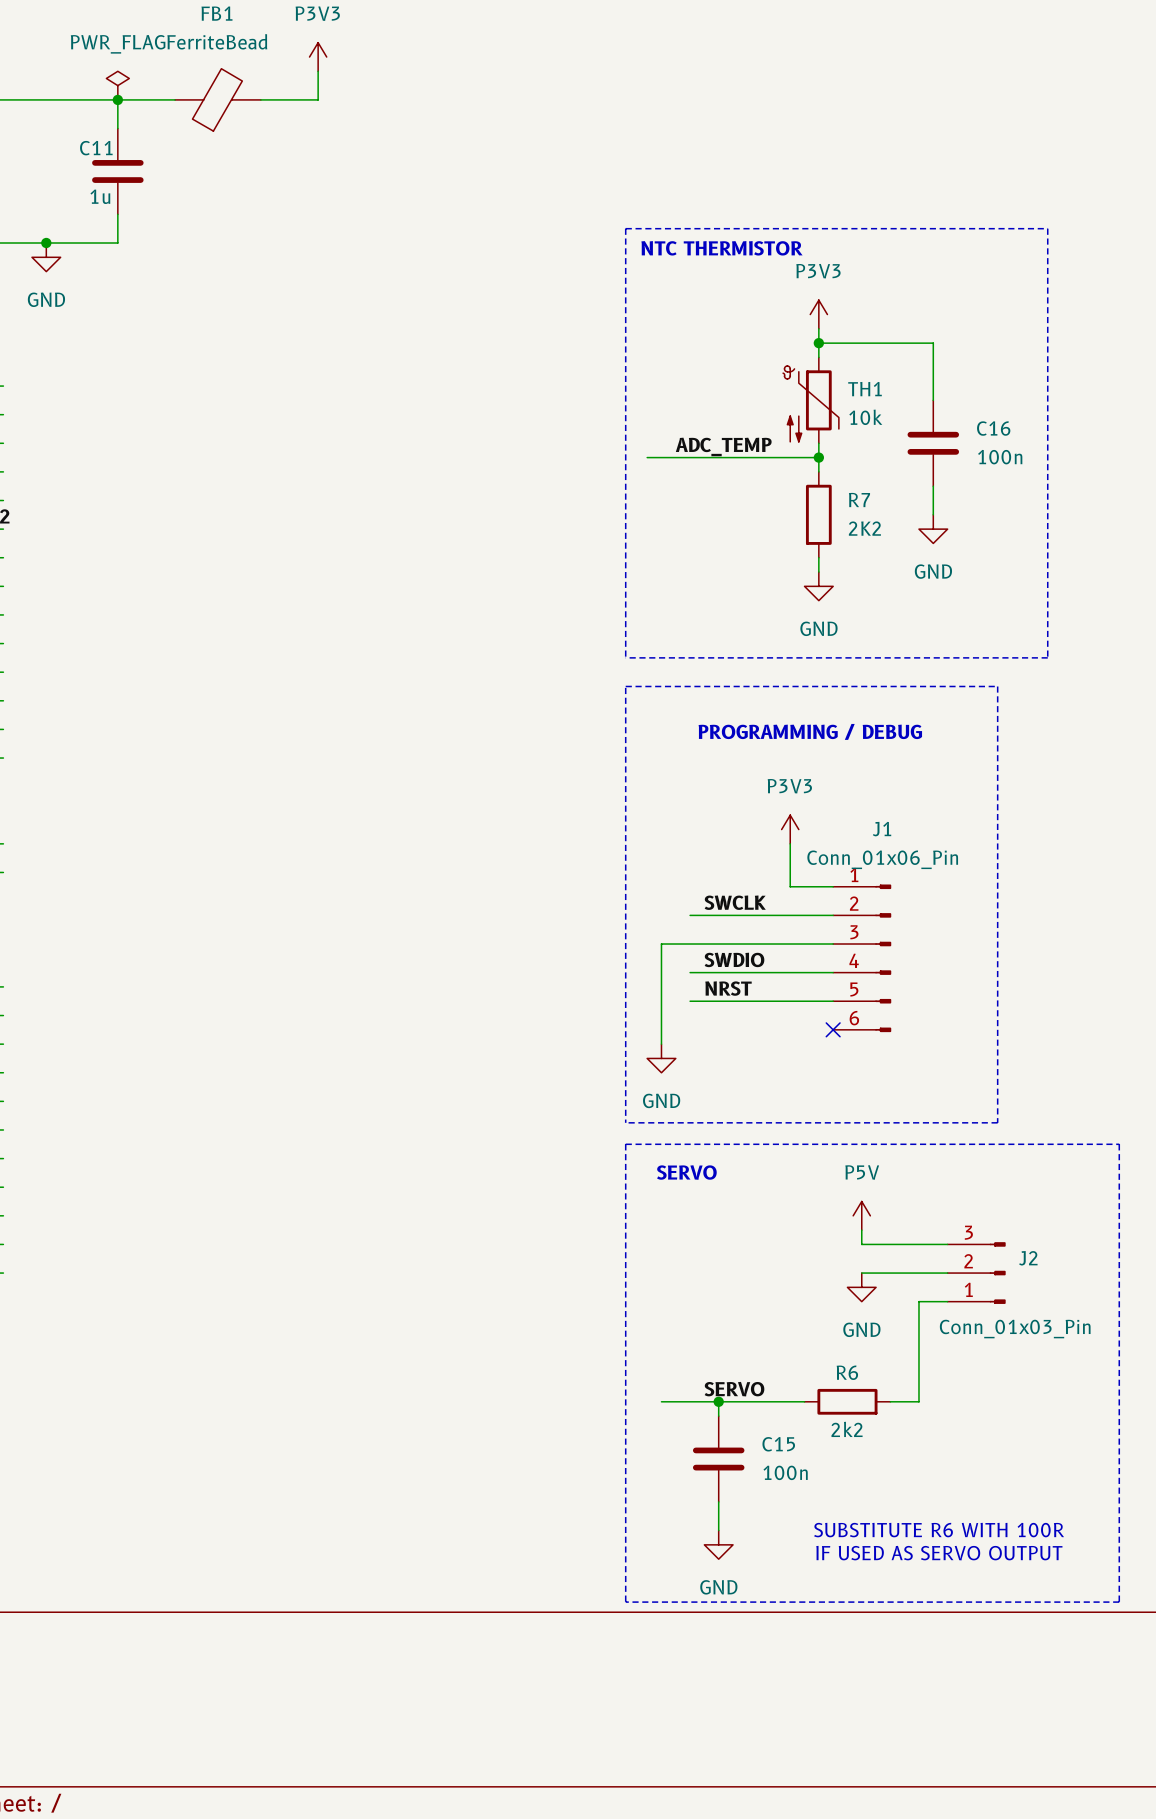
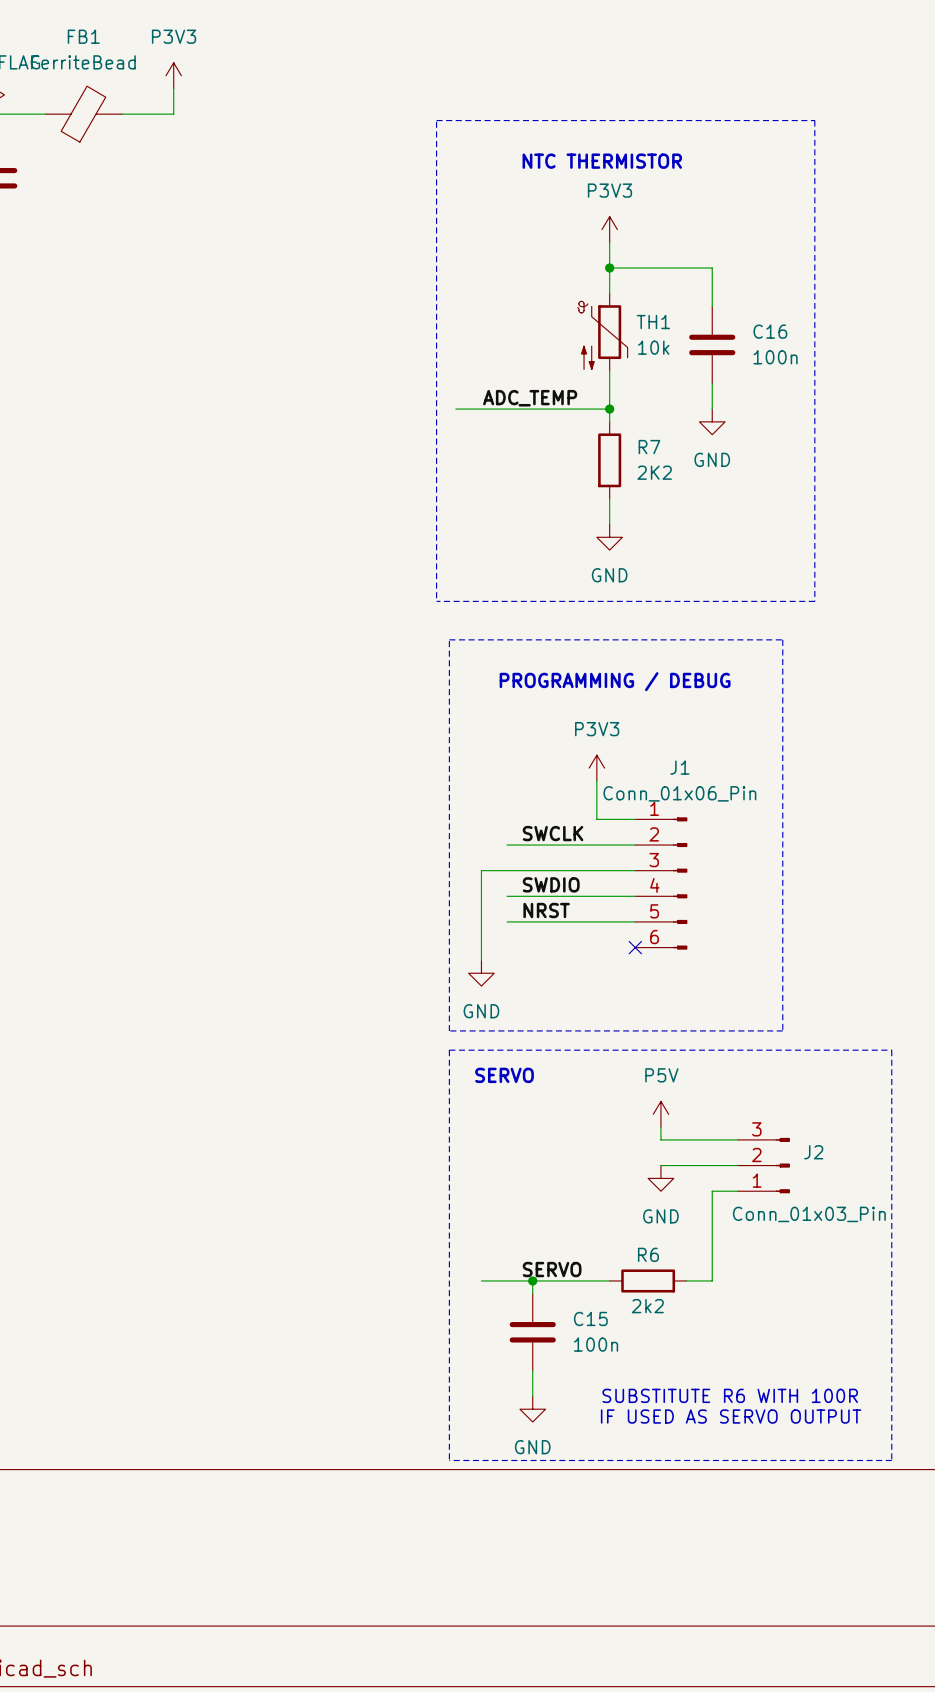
line: none -> (436, 120) (814, 120) (814, 601) (436, 601) (436, 121)
line: (625, 228) (1047, 228) (1047, 657) (625, 657) (625, 228) -> none
wire: none -> (609, 242) (609, 293)
text position: NTC THERMISTOR (722, 248) -> NTC THERMISTOR (602, 161)
wire: none -> (609, 268) (712, 268) (712, 306)
junction: none -> (609, 268)
power symbol position: P3V3 (818, 314) -> P3V3 (609, 229)
wire: (818, 328) (818, 357) -> none
wire: (818, 343) (933, 343) (933, 400) -> none
junction: (818, 343) -> none
wire: none -> (609, 370) (609, 421)
TH1 position: (810, 400) -> (602, 332)
wire: (818, 443) (818, 471) -> (609, 498) (609, 524)
power symbol: none -> GND (712, 421)
C16 position: (933, 443) -> (712, 344)
label position: ADC_TEMP (723, 446) -> ADC_TEMP (530, 398)
wire: (647, 457) (818, 457) -> (455, 409) (609, 409)
junction position: (818, 457) -> (609, 409)
wire: (933, 486) (933, 514) -> (712, 383) (712, 409)
R7 position: (818, 514) -> (609, 460)
power symbol: GND (933, 529) -> none
wire: (818, 557) (818, 572) -> none
power symbol position: GND (818, 586) -> GND (609, 537)

